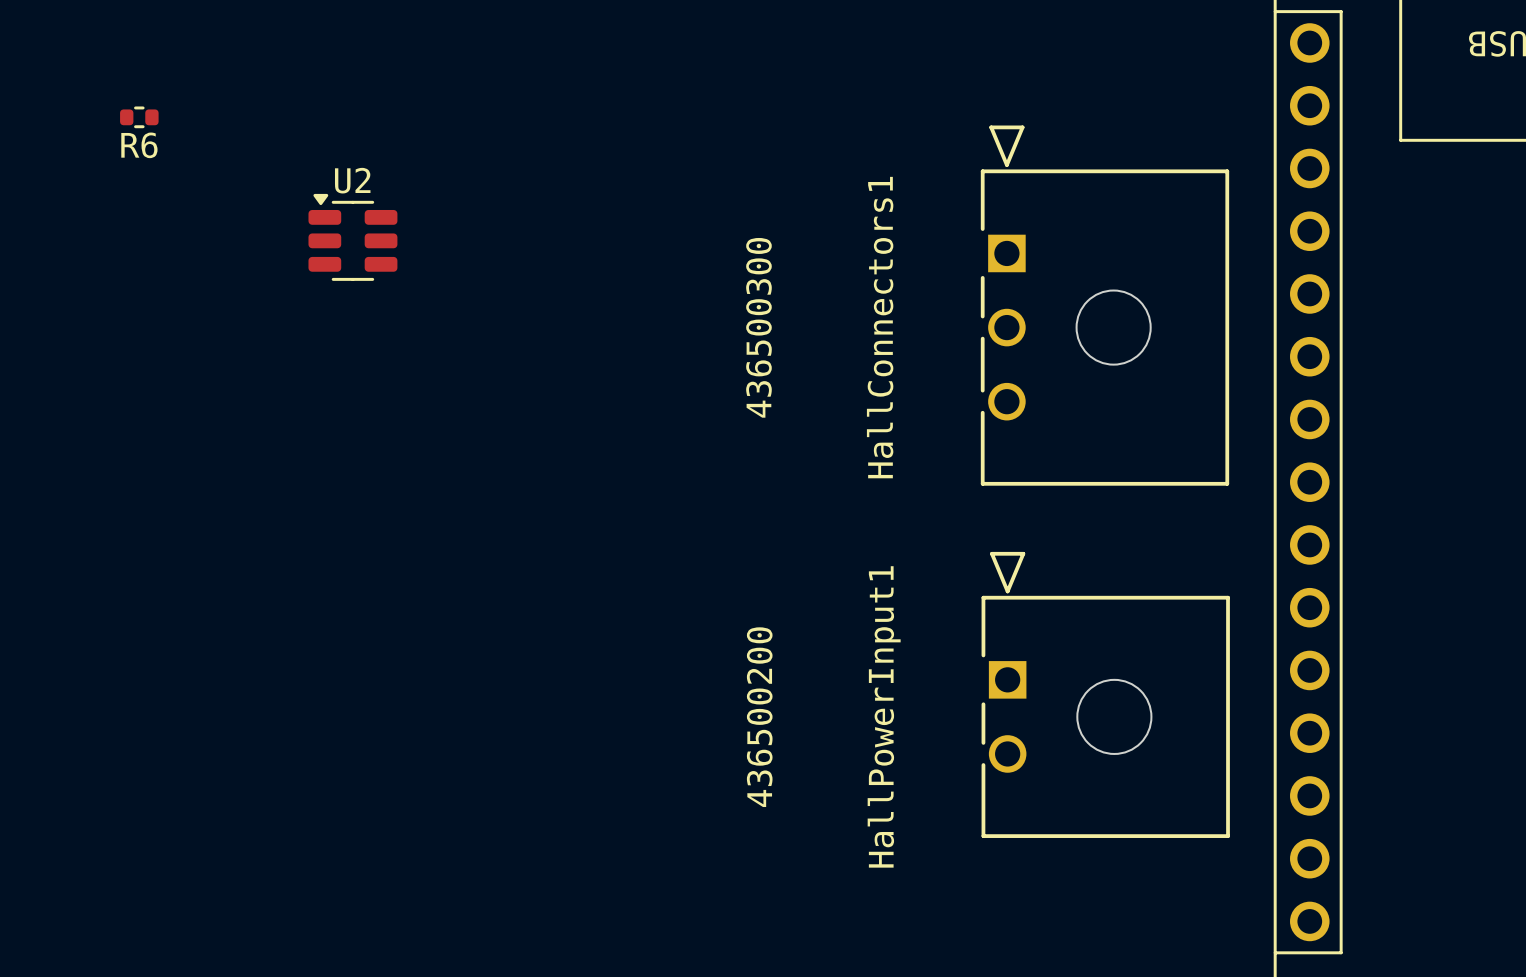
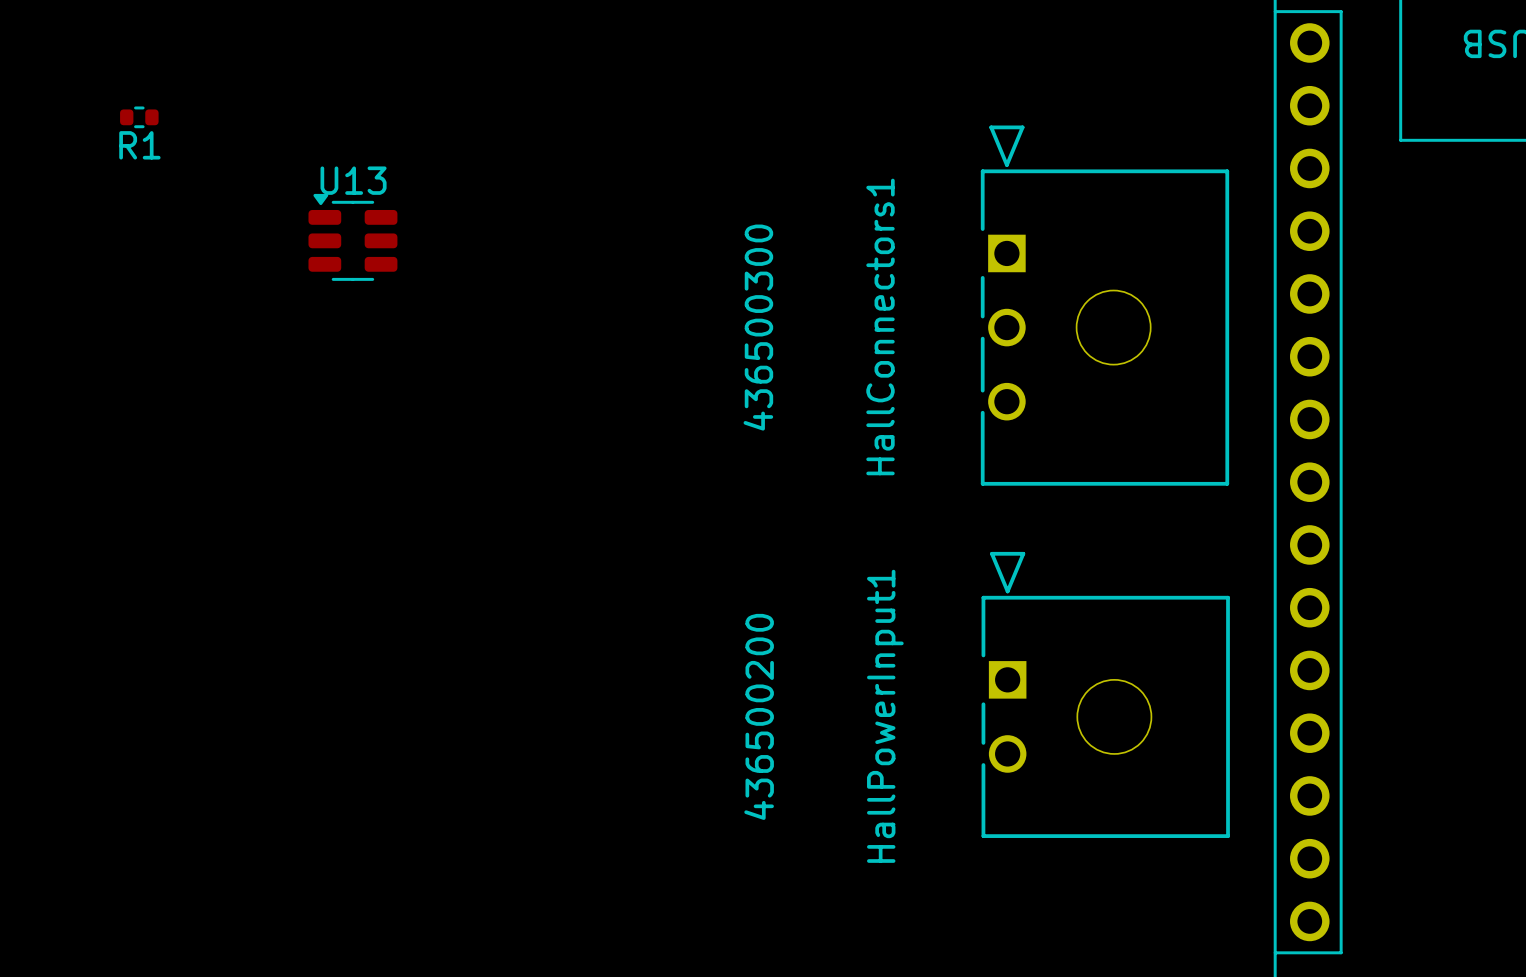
R6 name: R6 (139, 145) -> R1 (139, 145)
U2 name: U2 (352, 180) -> U13 (353, 180)

